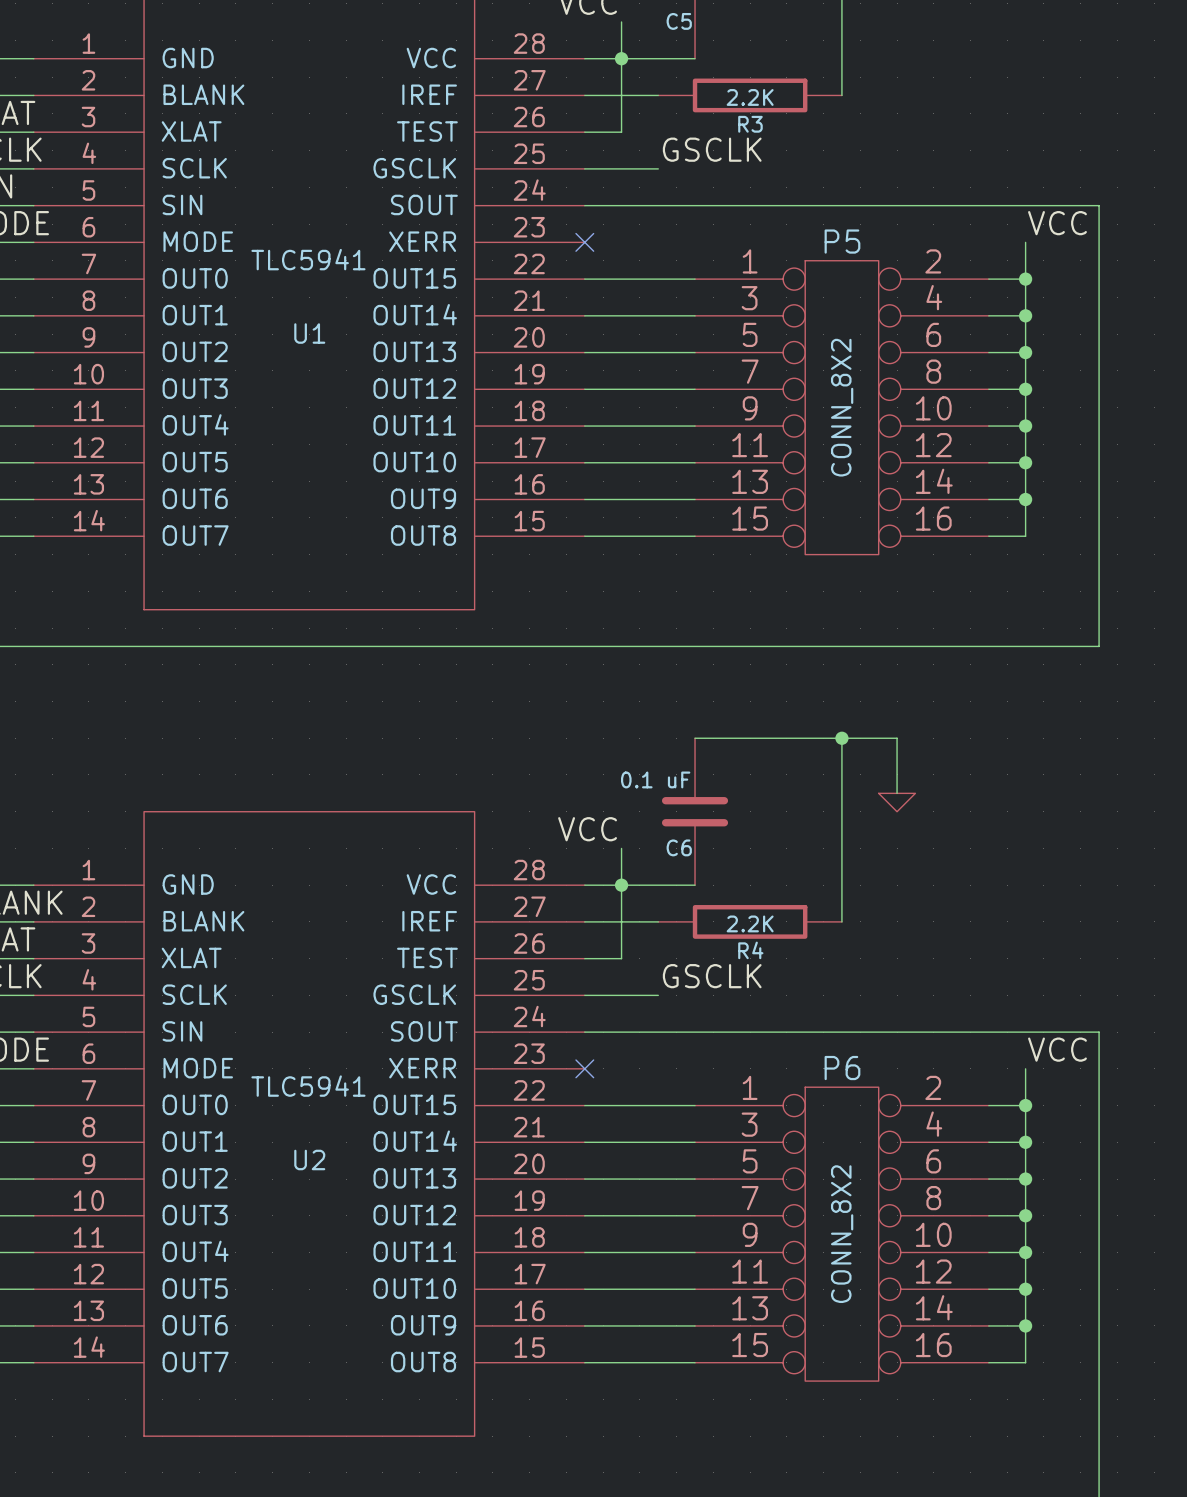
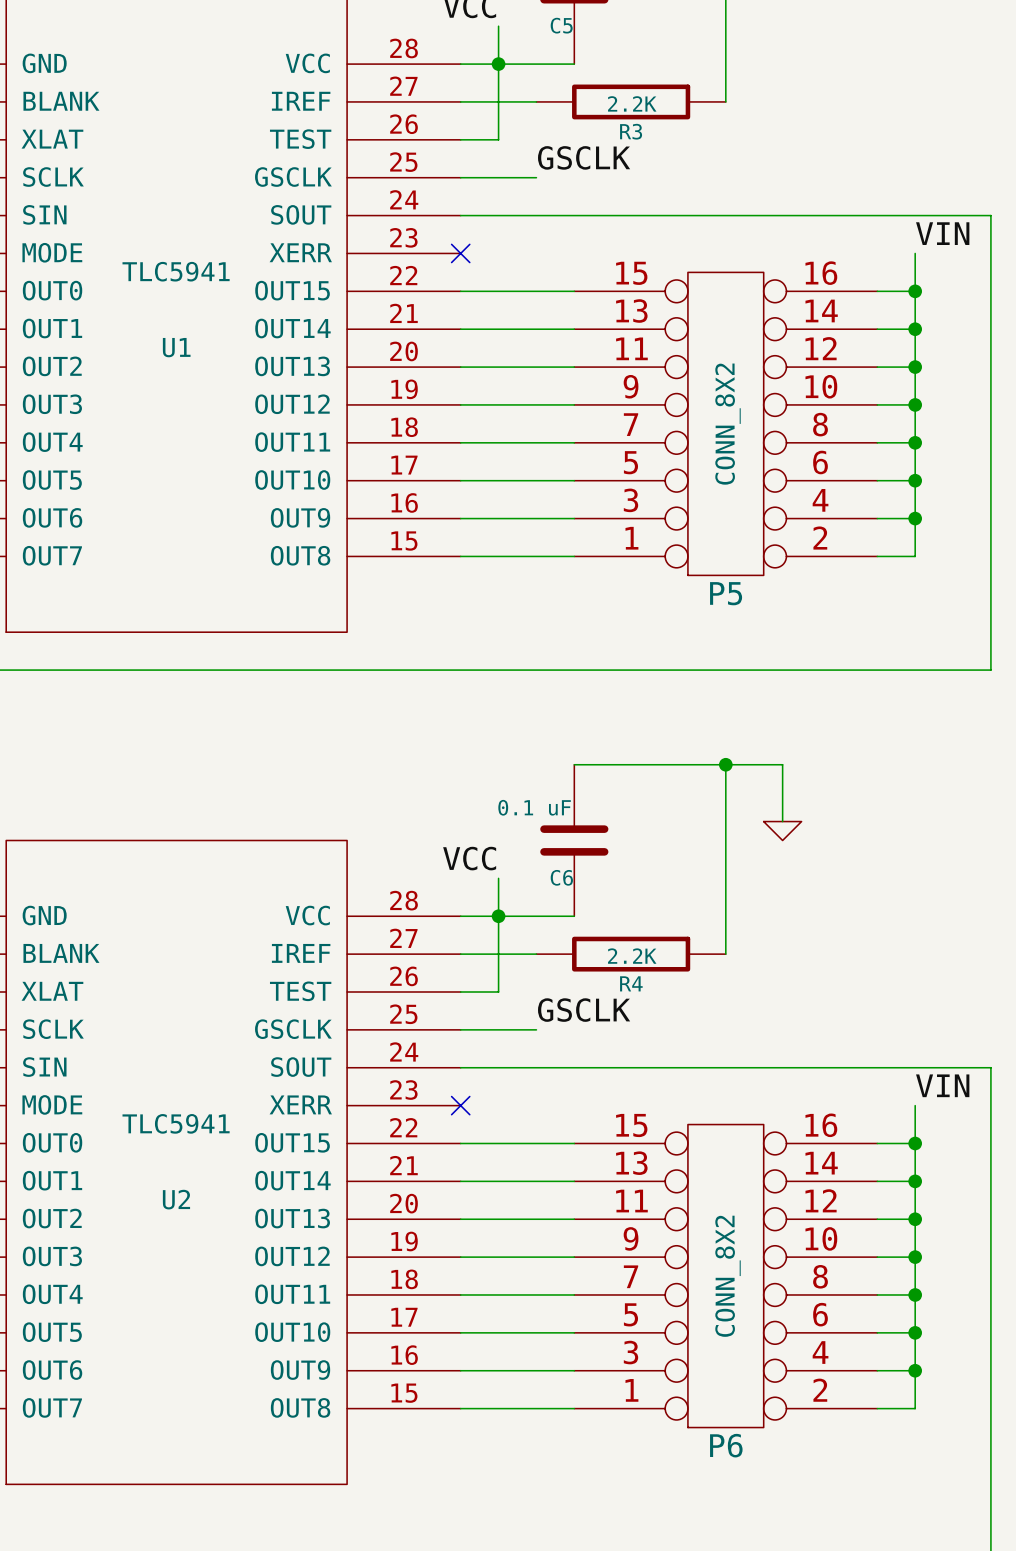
label: VCC (1057, 223) -> VIN (942, 233)
P5 flip: as is (841, 407) -> up-down (725, 423)
label: VCC (1057, 1049) -> VIN (942, 1085)
P6 flip: as is (841, 1234) -> up-down (725, 1276)

